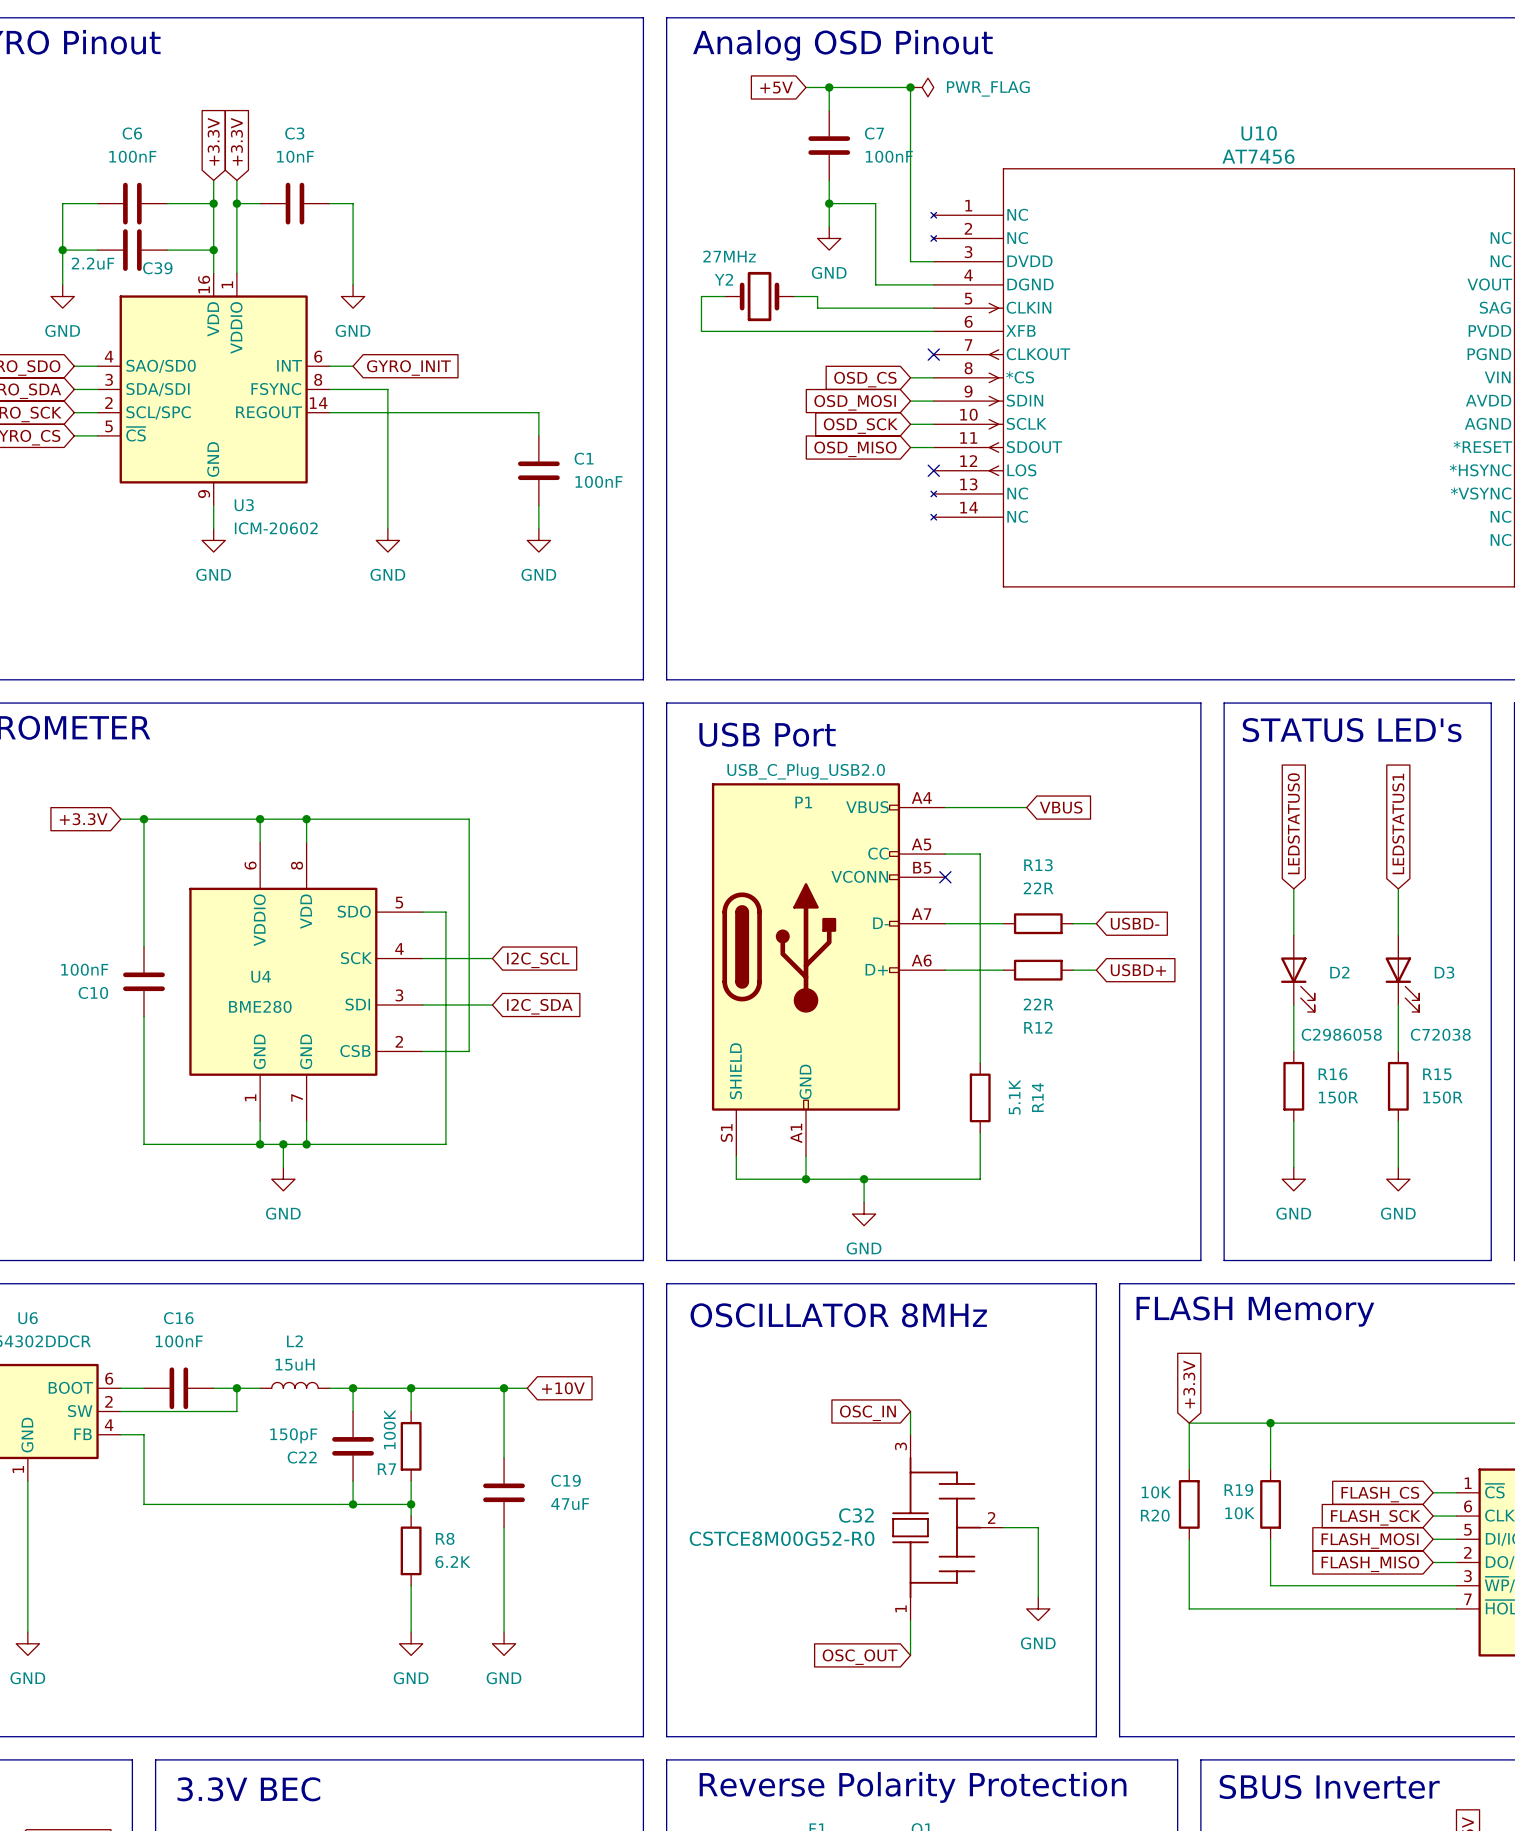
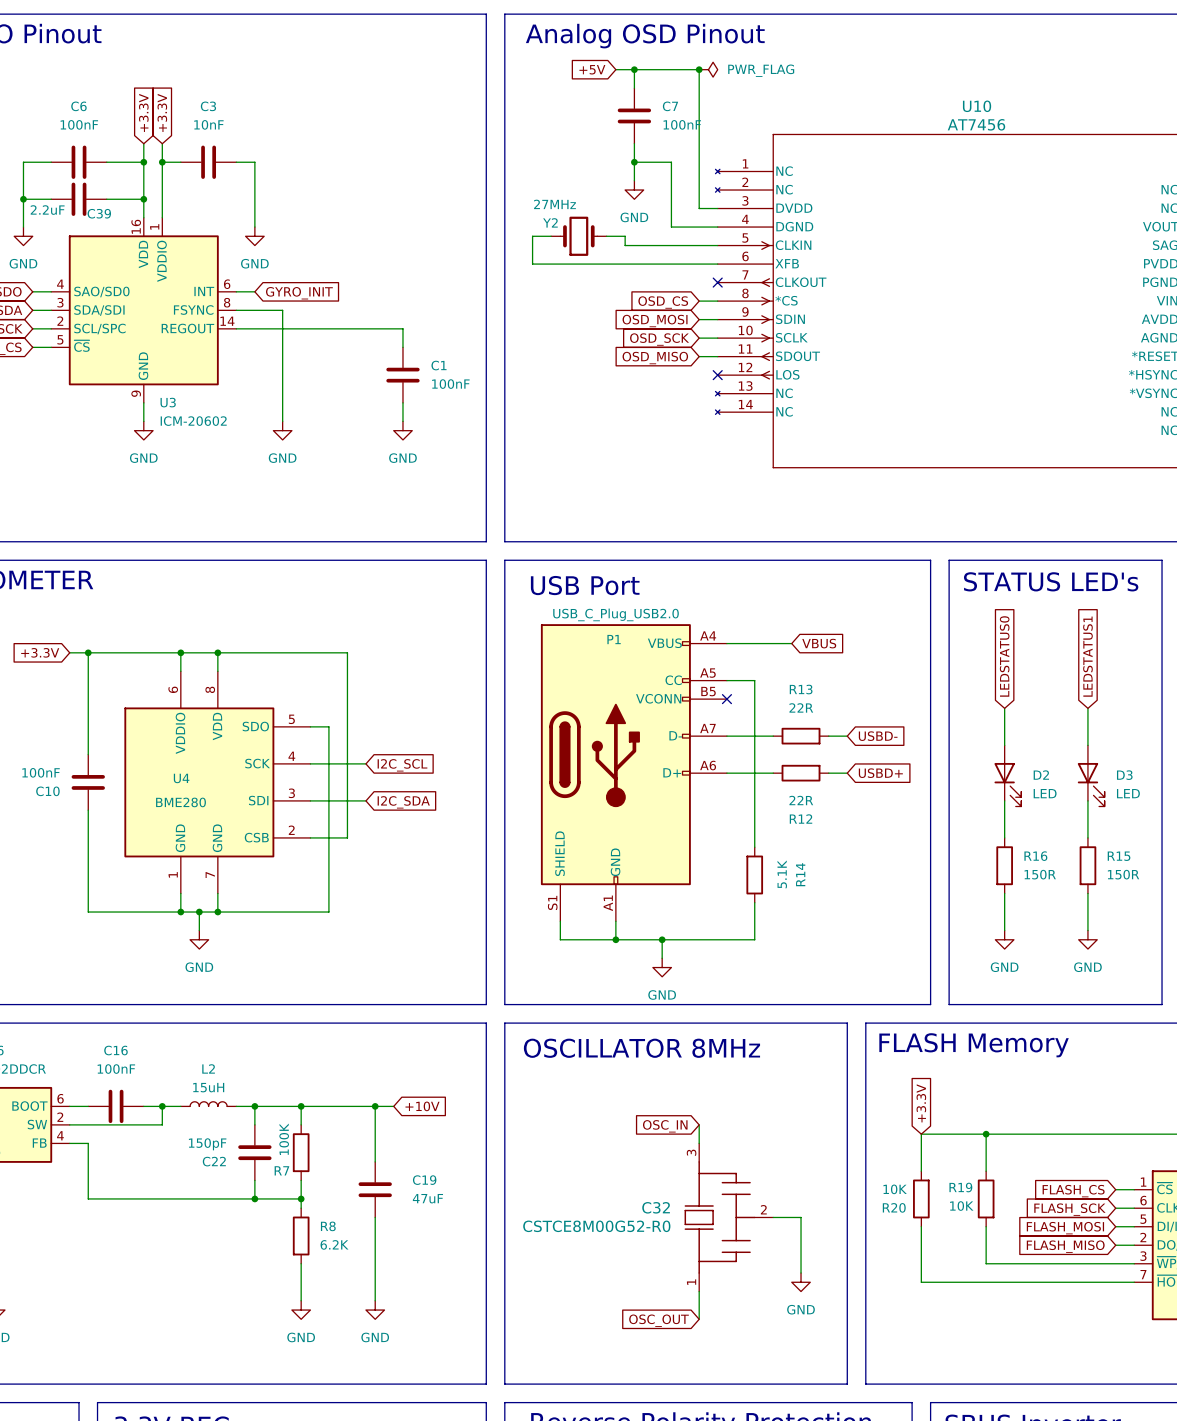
D2 value: C2986058 (1341, 1034) -> LED (1045, 793)
D3 value: C72038 (1440, 1034) -> LED (1128, 793)

